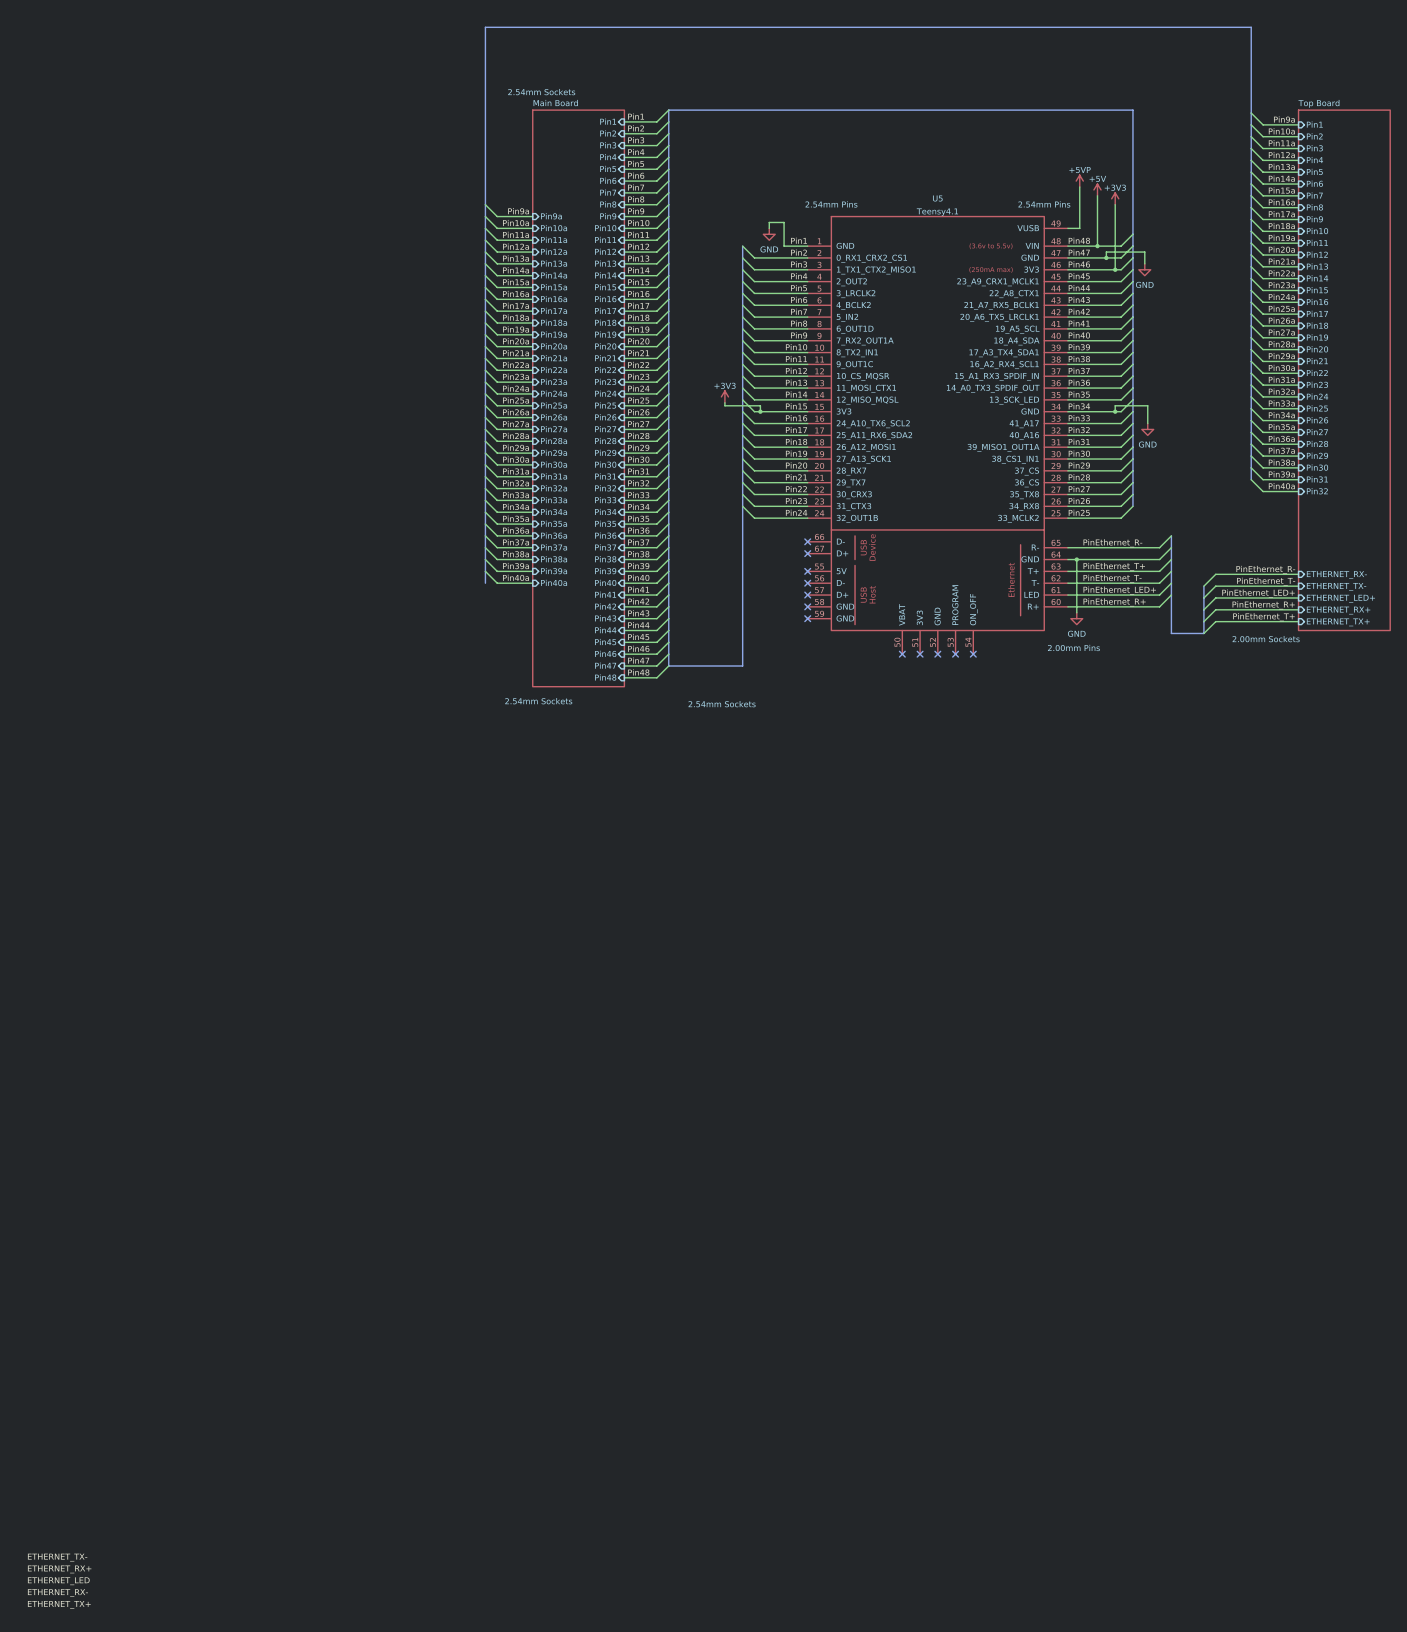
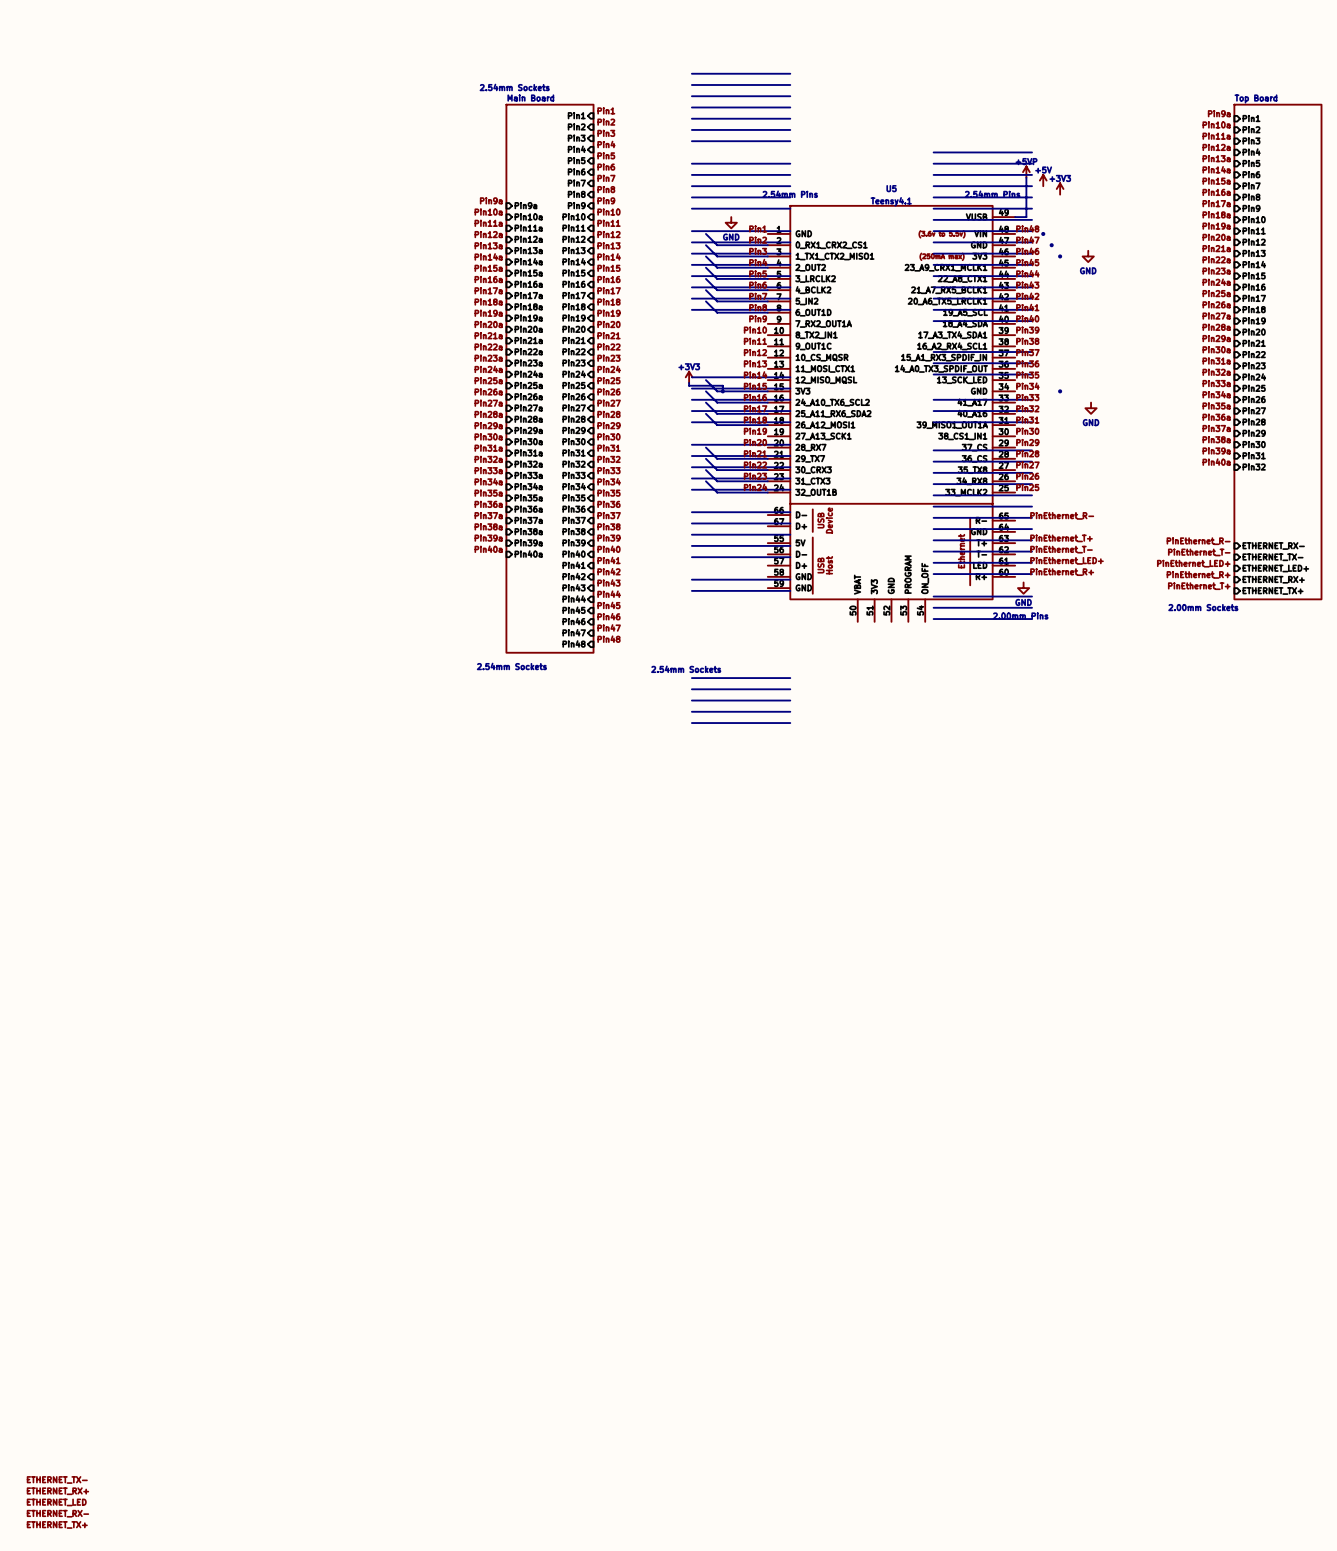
wire: none -> (691, 73) (790, 73)
wire: none -> (691, 84) (790, 84)
wire: none -> (691, 96) (790, 96)
wire: (668, 110) (656, 121) (624, 121) -> none
wire: none -> (691, 107) (790, 107)
wire: (1251, 113) (1263, 124) (1298, 124) -> none
wire: (668, 121) (656, 133) (624, 133) -> none
wire: none -> (691, 118) (790, 118)
wire: (1251, 124) (1263, 136) (1298, 136) -> none
wire: (668, 133) (656, 145) (624, 145) -> none
wire: none -> (691, 129) (790, 129)
wire: (1251, 136) (1263, 148) (1298, 148) -> none
wire: (668, 145) (656, 157) (624, 157) -> none
wire: none -> (691, 141) (790, 141)
wire: (1251, 148) (1263, 160) (1298, 160) -> none
wire: (668, 157) (656, 169) (624, 169) -> none
wire: none -> (933, 152) (1032, 152)
wire: (1251, 160) (1263, 172) (1298, 172) -> none
wire: (668, 169) (656, 181) (624, 181) -> none
wire: none -> (691, 163) (790, 163)
wire: none -> (933, 163) (1032, 163)
wire: (1251, 172) (1263, 184) (1298, 184) -> none
wire: (668, 181) (656, 192) (624, 192) -> none
wire: none -> (691, 174) (790, 174)
wire: none -> (933, 174) (1032, 174)
wire: (1251, 184) (1263, 195) (1298, 195) -> none
wire: (668, 192) (656, 204) (624, 204) -> none
wire: none -> (691, 186) (790, 186)
wire: none -> (933, 186) (1032, 186)
wire: (1097, 195) (1097, 246) -> none
wire: (1251, 195) (1263, 207) (1298, 207) -> none
wire: (485, 204) (497, 216) (532, 216) -> none
wire: (668, 204) (656, 216) (624, 216) -> none
wire: (1115, 204) (1115, 269) -> none
wire: none -> (691, 197) (790, 197)
wire: none -> (933, 197) (1032, 197)
wire: (1251, 207) (1263, 219) (1298, 219) -> none
wire: (485, 216) (497, 228) (532, 228) -> none
wire: (668, 216) (656, 228) (624, 228) -> none
wire: none -> (691, 208) (790, 208)
wire: none -> (933, 208) (1032, 208)
wire: (1251, 219) (1263, 231) (1298, 231) -> none
wire: (485, 228) (497, 240) (532, 240) -> none
wire: (668, 228) (656, 240) (624, 240) -> none
wire: (769, 228) (769, 222) (784, 222) (784, 246) (807, 246) -> none
wire: none -> (933, 219) (1032, 219)
wire: (1251, 231) (1263, 243) (1298, 243) -> none
wire: (1132, 234) (1121, 246) (1067, 246) -> none
wire: (485, 240) (497, 252) (532, 252) -> none
wire: (668, 240) (656, 252) (624, 252) -> none
wire: none -> (691, 231) (790, 231)
wire: none -> (933, 231) (1032, 231)
wire: (1251, 243) (1263, 254) (1298, 254) -> none
bus: (742, 246) (742, 665) (668, 665) (668, 110) (1132, 110) (1132, 506) -> none
wire: (1132, 246) (1121, 257) (1067, 257) -> none
wire: (485, 252) (497, 263) (532, 263) -> none
wire: (668, 252) (656, 263) (624, 263) -> none
wire: none -> (691, 242) (790, 242)
wire: none -> (933, 242) (1032, 242)
wire: (1251, 254) (1263, 266) (1298, 266) -> none
wire: (1106, 257) (1106, 252) (1144, 252) (1144, 263) -> none
wire: (1132, 257) (1121, 269) (1067, 269) -> none
wire: (485, 263) (497, 275) (532, 275) -> none
wire: (668, 263) (656, 275) (624, 275) -> none
wire: none -> (691, 253) (790, 253)
wire: none -> (933, 253) (1032, 253)
wire: (1251, 266) (1263, 278) (1298, 278) -> none
wire: (1132, 269) (1121, 281) (1067, 281) -> none
wire: (485, 275) (497, 287) (532, 287) -> none
wire: (668, 275) (656, 287) (624, 287) -> none
wire: none -> (691, 264) (790, 264)
wire: none -> (933, 264) (1032, 264)
wire: (1251, 278) (1263, 290) (1298, 290) -> none
wire: (1132, 281) (1121, 293) (1067, 293) -> none
wire: (485, 287) (497, 299) (532, 299) -> none
wire: (668, 287) (656, 299) (624, 299) -> none
wire: none -> (691, 276) (790, 276)
wire: none -> (933, 276) (1032, 276)
wire: (1251, 290) (1263, 302) (1298, 302) -> none
wire: (1132, 293) (1121, 305) (1067, 305) -> none
wire: (485, 299) (497, 311) (532, 311) -> none
wire: (668, 299) (656, 311) (624, 311) -> none
wire: none -> (691, 287) (790, 287)
wire: none -> (933, 287) (1032, 287)
wire: (1251, 302) (1263, 314) (1298, 314) -> none
wire: (1132, 305) (1121, 317) (1067, 317) -> none
wire: (485, 311) (497, 323) (532, 323) -> none
wire: (668, 311) (656, 323) (624, 323) -> none
wire: none -> (691, 298) (790, 298)
wire: none -> (933, 298) (1032, 298)
wire: (1251, 314) (1263, 325) (1298, 325) -> none
wire: (1132, 317) (1121, 328) (1067, 328) -> none
wire: (485, 323) (497, 334) (532, 334) -> none
wire: (668, 323) (656, 334) (624, 334) -> none
wire: none -> (691, 309) (790, 309)
wire: none -> (933, 309) (1032, 309)
wire: (1251, 325) (1263, 337) (1298, 337) -> none
wire: (742, 328) (754, 340) (807, 340) -> none
wire: (1132, 328) (1121, 340) (1067, 340) -> none
wire: (485, 334) (497, 346) (532, 346) -> none
wire: (668, 334) (656, 346) (624, 346) -> none
wire: none -> (933, 321) (1032, 321)
wire: (1251, 337) (1263, 349) (1298, 349) -> none
wire: (742, 340) (754, 352) (807, 352) -> none
wire: (1132, 340) (1121, 352) (1067, 352) -> none
wire: (485, 346) (497, 358) (532, 358) -> none
wire: (668, 346) (656, 358) (624, 358) -> none
wire: (1251, 349) (1263, 361) (1298, 361) -> none
wire: (742, 352) (754, 364) (807, 364) -> none
wire: (1132, 352) (1121, 364) (1067, 364) -> none
wire: (485, 358) (497, 370) (532, 370) -> none
wire: (668, 358) (656, 370) (624, 370) -> none
wire: (1251, 361) (1263, 373) (1298, 373) -> none
wire: (742, 364) (754, 376) (807, 376) -> none
wire: (1132, 364) (1121, 376) (1067, 376) -> none
wire: (485, 370) (497, 382) (532, 382) -> none
wire: (668, 370) (656, 382) (624, 382) -> none
wire: none -> (933, 352) (1032, 352)
wire: (1251, 373) (1263, 385) (1298, 385) -> none
wire: (742, 376) (754, 388) (807, 388) -> none
wire: (1132, 376) (1121, 388) (1067, 388) -> none
wire: (485, 382) (497, 393) (532, 393) -> none
wire: (668, 382) (656, 393) (624, 393) -> none
wire: none -> (933, 363) (1032, 363)
wire: (1251, 385) (1263, 396) (1298, 396) -> none
wire: (742, 388) (754, 399) (807, 399) -> none
wire: (1132, 388) (1121, 399) (1067, 399) -> none
wire: (485, 393) (497, 405) (532, 405) -> none
wire: (668, 393) (656, 405) (624, 405) -> none
wire: none -> (933, 374) (1032, 374)
wire: none -> (691, 377) (790, 377)
wire: (1251, 396) (1263, 408) (1298, 408) -> none
wire: (1132, 399) (1121, 411) (1067, 411) -> none
wire: (485, 405) (497, 417) (532, 417) -> none
wire: (668, 405) (656, 417) (624, 417) -> none
wire: none -> (691, 388) (790, 388)
wire: (1251, 408) (1263, 420) (1298, 420) -> none
wire: (1115, 411) (1115, 405) (1147, 405) (1147, 423) -> none
wire: (1132, 411) (1121, 423) (1067, 423) -> none
wire: (485, 417) (497, 429) (532, 429) -> none
wire: (668, 417) (656, 429) (624, 429) -> none
wire: none -> (691, 399) (790, 399)
wire: none -> (933, 399) (1032, 399)
wire: (1251, 420) (1263, 432) (1298, 432) -> none
wire: (1132, 423) (1121, 435) (1067, 435) -> none
wire: (485, 429) (497, 441) (532, 441) -> none
wire: (668, 429) (656, 441) (624, 441) -> none
wire: none -> (691, 411) (790, 411)
wire: none -> (933, 411) (1032, 411)
wire: (1251, 432) (1263, 444) (1298, 444) -> none
wire: (1132, 435) (1121, 447) (1067, 447) -> none
wire: (485, 441) (497, 453) (532, 453) -> none
wire: (668, 441) (656, 453) (624, 453) -> none
wire: none -> (691, 422) (790, 422)
wire: none -> (933, 422) (1032, 422)
wire: (1251, 444) (1263, 456) (1298, 456) -> none
wire: (742, 447) (754, 459) (807, 459) -> none
wire: (1132, 447) (1121, 459) (1067, 459) -> none
wire: (485, 453) (497, 464) (532, 464) -> none
wire: (668, 453) (656, 464) (624, 464) -> none
wire: (1251, 456) (1263, 467) (1298, 467) -> none
wire: (742, 459) (754, 470) (807, 470) -> none
wire: (1132, 459) (1121, 470) (1067, 470) -> none
wire: (485, 464) (497, 476) (532, 476) -> none
wire: (668, 464) (656, 476) (624, 476) -> none
wire: none -> (691, 444) (790, 444)
wire: (1251, 467) (1263, 479) (1298, 479) -> none
wire: (1132, 470) (1121, 482) (1067, 482) -> none
wire: none -> (933, 450) (1032, 450)
wire: (485, 476) (497, 488) (532, 488) -> none
wire: (668, 476) (656, 488) (624, 488) -> none
wire: none -> (691, 456) (790, 456)
wire: (1251, 479) (1263, 491) (1298, 491) -> none
bus: (1251, 479) (1251, 27) (485, 27) (485, 583) -> none
wire: (1132, 482) (1121, 494) (1067, 494) -> none
wire: none -> (933, 461) (1032, 461)
wire: (485, 488) (497, 500) (532, 500) -> none
wire: (668, 488) (656, 500) (624, 500) -> none
wire: none -> (691, 467) (790, 467)
wire: (1132, 494) (1121, 506) (1067, 506) -> none
wire: none -> (933, 472) (1032, 472)
wire: (485, 500) (497, 512) (532, 512) -> none
wire: (668, 500) (656, 512) (624, 512) -> none
wire: none -> (691, 478) (790, 478)
wire: (1132, 506) (1121, 518) (1067, 518) -> none
wire: none -> (933, 484) (1032, 484)
wire: (485, 512) (497, 524) (532, 524) -> none
wire: (668, 512) (656, 524) (624, 524) -> none
wire: none -> (691, 489) (790, 489)
wire: none -> (933, 495) (1032, 495)
wire: (485, 524) (497, 535) (532, 535) -> none
wire: (668, 524) (656, 535) (624, 535) -> none
wire: none -> (933, 506) (1032, 506)
wire: (485, 535) (497, 547) (532, 547) -> none
wire: (668, 535) (656, 547) (624, 547) -> none
wire: (1171, 535) (1159, 547) (1067, 547) -> none
bus: (1171, 535) (1171, 633) (1203, 633) (1203, 586) -> none
wire: none -> (691, 512) (790, 512)
no-connect mark: (807, 541) -> none
wire: none -> (933, 517) (1032, 517)
wire: (485, 547) (497, 559) (532, 559) -> none
wire: (668, 547) (656, 559) (624, 559) -> none
wire: (1171, 547) (1159, 559) (1067, 559) -> none
wire: none -> (691, 523) (790, 523)
no-connect mark: (807, 553) -> none
wire: none -> (933, 529) (1032, 529)
wire: (485, 559) (497, 571) (532, 571) -> none
wire: (668, 559) (656, 571) (624, 571) -> none
wire: (1076, 559) (1076, 612) -> none
junction: (1076, 559) -> none
wire: (1171, 559) (1159, 571) (1067, 571) -> none
wire: none -> (691, 534) (790, 534)
wire: none -> (933, 540) (1032, 540)
wire: (485, 571) (497, 583) (532, 583) -> none
wire: (668, 571) (656, 583) (624, 583) -> none
no-connect mark: (807, 571) -> none
wire: (1171, 571) (1159, 583) (1067, 583) -> none
wire: none -> (691, 545) (790, 545)
wire: (1298, 574) (1215, 574) (1203, 586) -> none
wire: none -> (933, 551) (1032, 551)
wire: (668, 583) (656, 595) (624, 595) -> none
no-connect mark: (807, 583) -> none
wire: (1171, 583) (1159, 595) (1067, 595) -> none
wire: none -> (691, 557) (790, 557)
wire: (1298, 586) (1215, 586) (1203, 597) -> none
wire: none -> (933, 562) (1032, 562)
wire: (668, 595) (656, 606) (624, 606) -> none
no-connect mark: (807, 595) -> none
wire: (1171, 595) (1159, 606) (1067, 606) -> none
wire: (1298, 597) (1215, 597) (1203, 609) -> none
wire: none -> (933, 574) (1032, 574)
wire: (668, 606) (656, 618) (624, 618) -> none
no-connect mark: (807, 606) -> none
wire: none -> (691, 579) (790, 579)
wire: (1298, 609) (1215, 609) (1203, 621) -> none
wire: (668, 618) (656, 630) (624, 630) -> none
no-connect mark: (807, 618) -> none
wire: none -> (691, 590) (790, 590)
wire: (1298, 621) (1215, 621) (1203, 633) -> none
wire: none -> (933, 596) (1032, 596)
wire: (668, 630) (656, 642) (624, 642) -> none
wire: none -> (933, 607) (1032, 607)
wire: (668, 642) (656, 654) (624, 654) -> none
wire: none -> (933, 619) (1032, 619)
wire: (668, 654) (656, 665) (624, 665) -> none
no-connect mark: (902, 654) -> none
no-connect mark: (920, 654) -> none
no-connect mark: (937, 654) -> none
no-connect mark: (955, 654) -> none
no-connect mark: (973, 654) -> none
wire: (668, 665) (656, 677) (624, 677) -> none
wire: none -> (691, 678) (790, 678)
wire: none -> (691, 689) (790, 689)
wire: none -> (691, 700) (790, 700)
wire: none -> (691, 711) (790, 711)
wire: none -> (691, 723) (790, 723)

